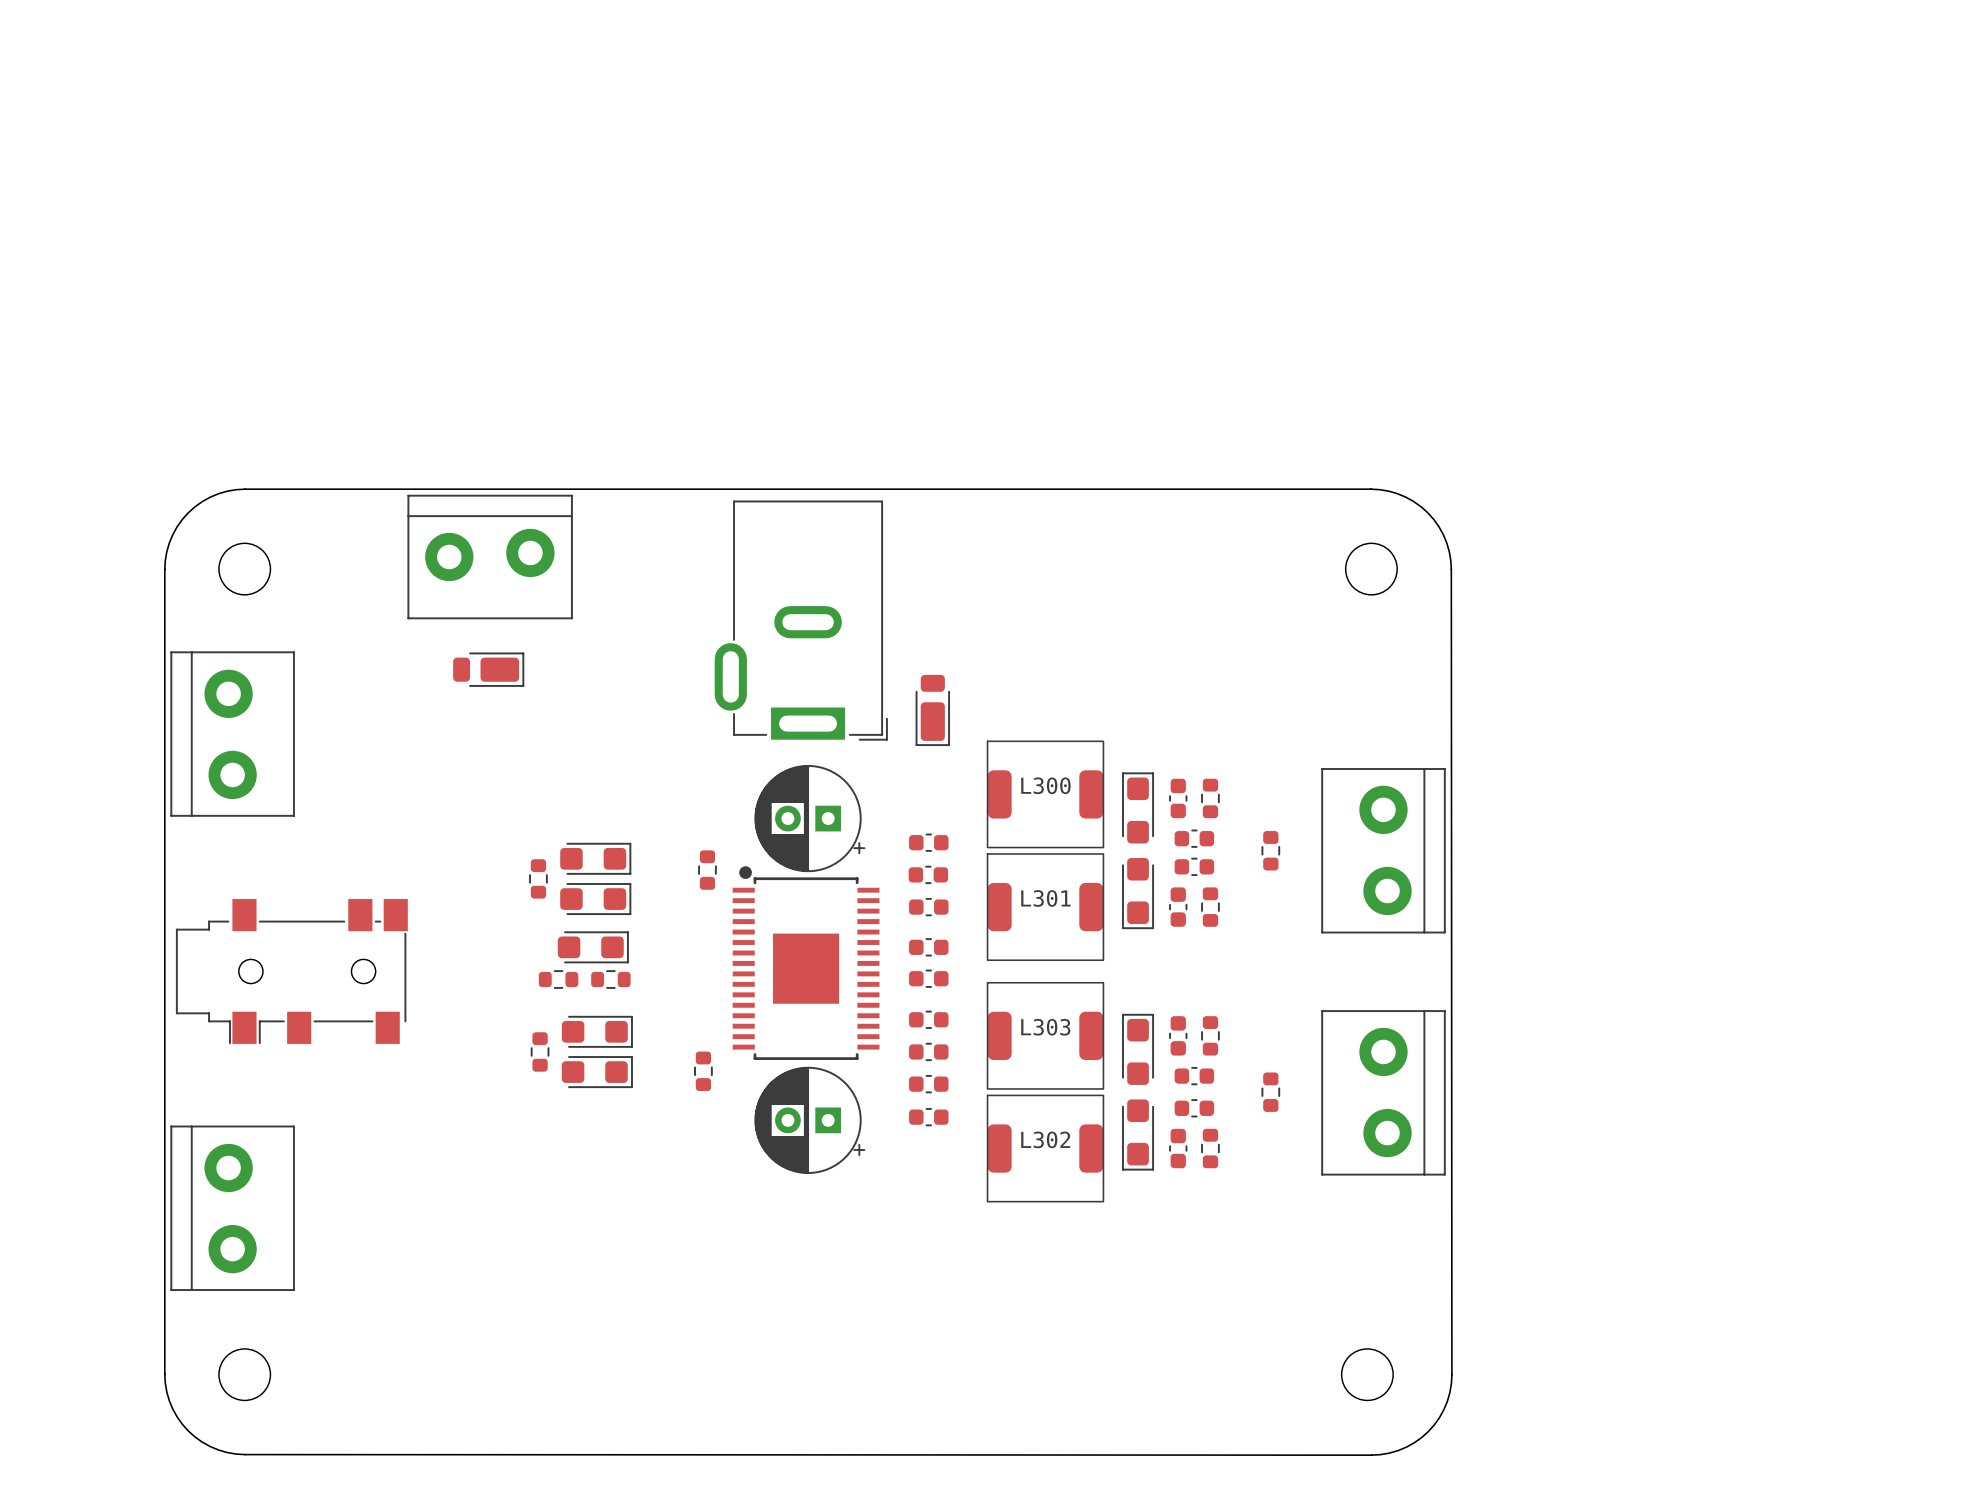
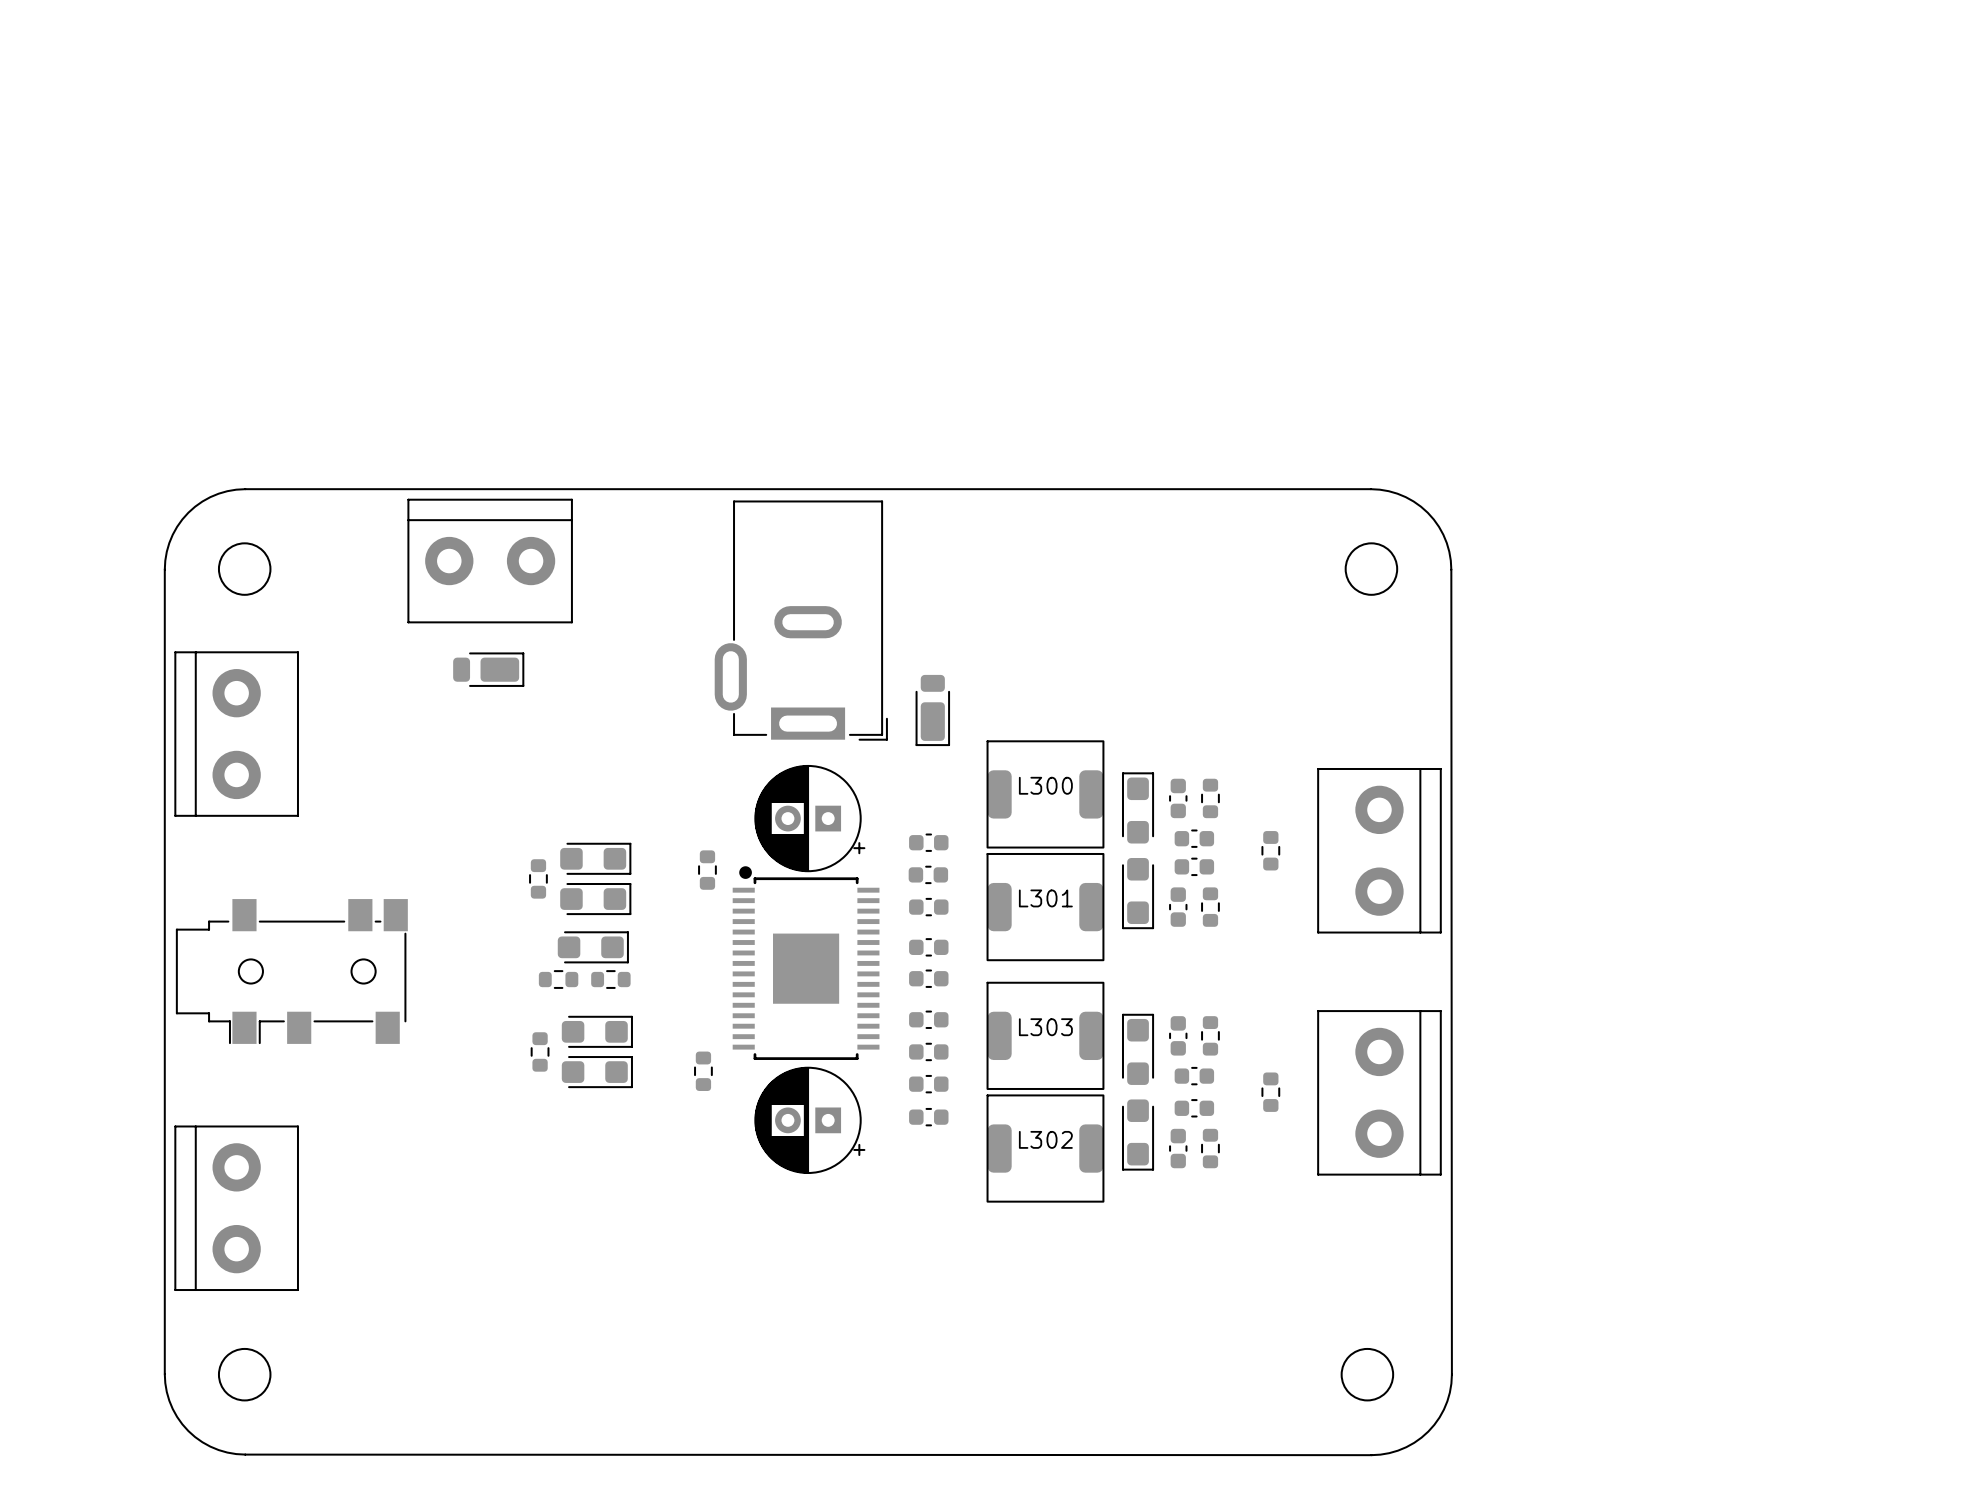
part footprint: [407, 494, 573, 620] -> [407, 498, 573, 624]
part footprint: [170, 651, 295, 817] -> [174, 651, 299, 817]
part footprint: [1321, 768, 1446, 934] -> [1317, 768, 1442, 934]
part footprint: [1321, 1010, 1446, 1176] -> [1317, 1010, 1442, 1176]
part footprint: [170, 1125, 295, 1291] -> [174, 1125, 299, 1291]

